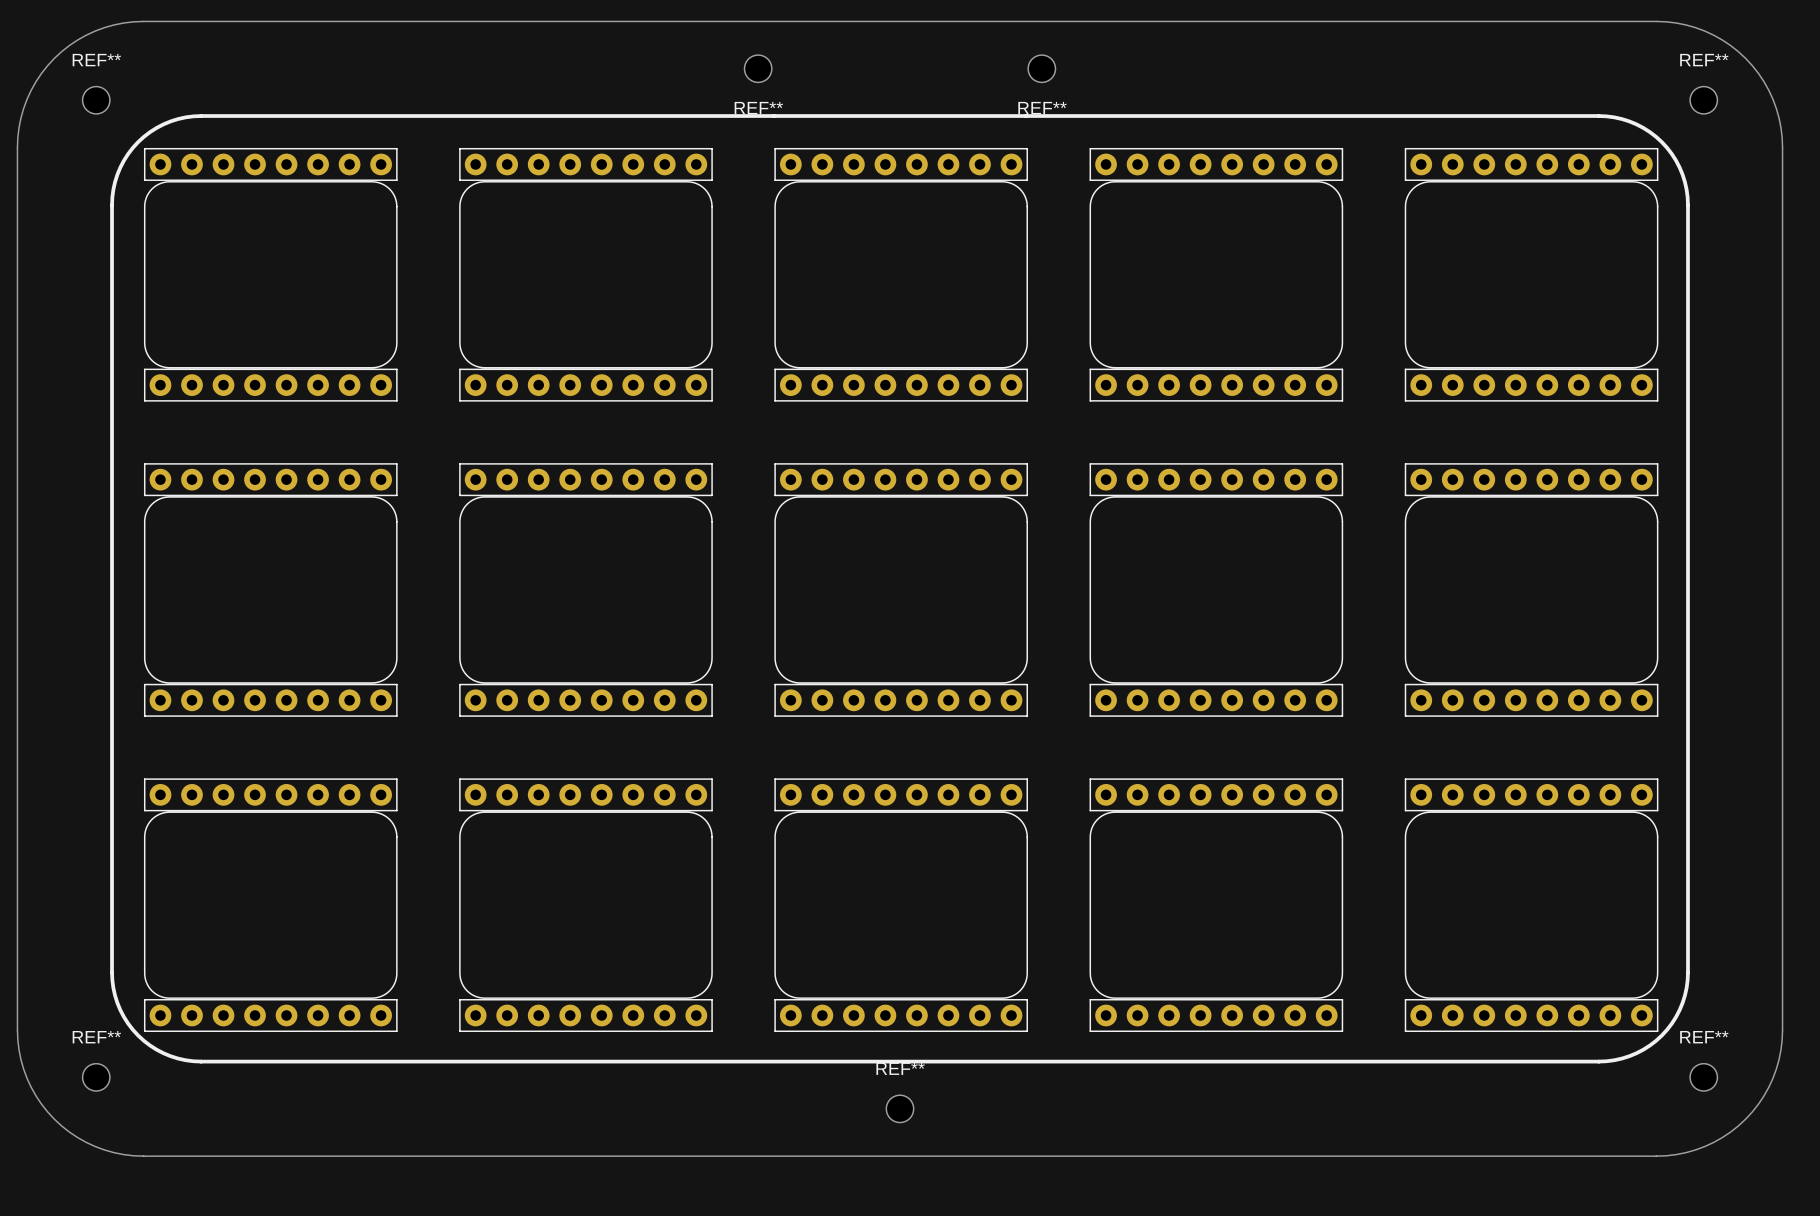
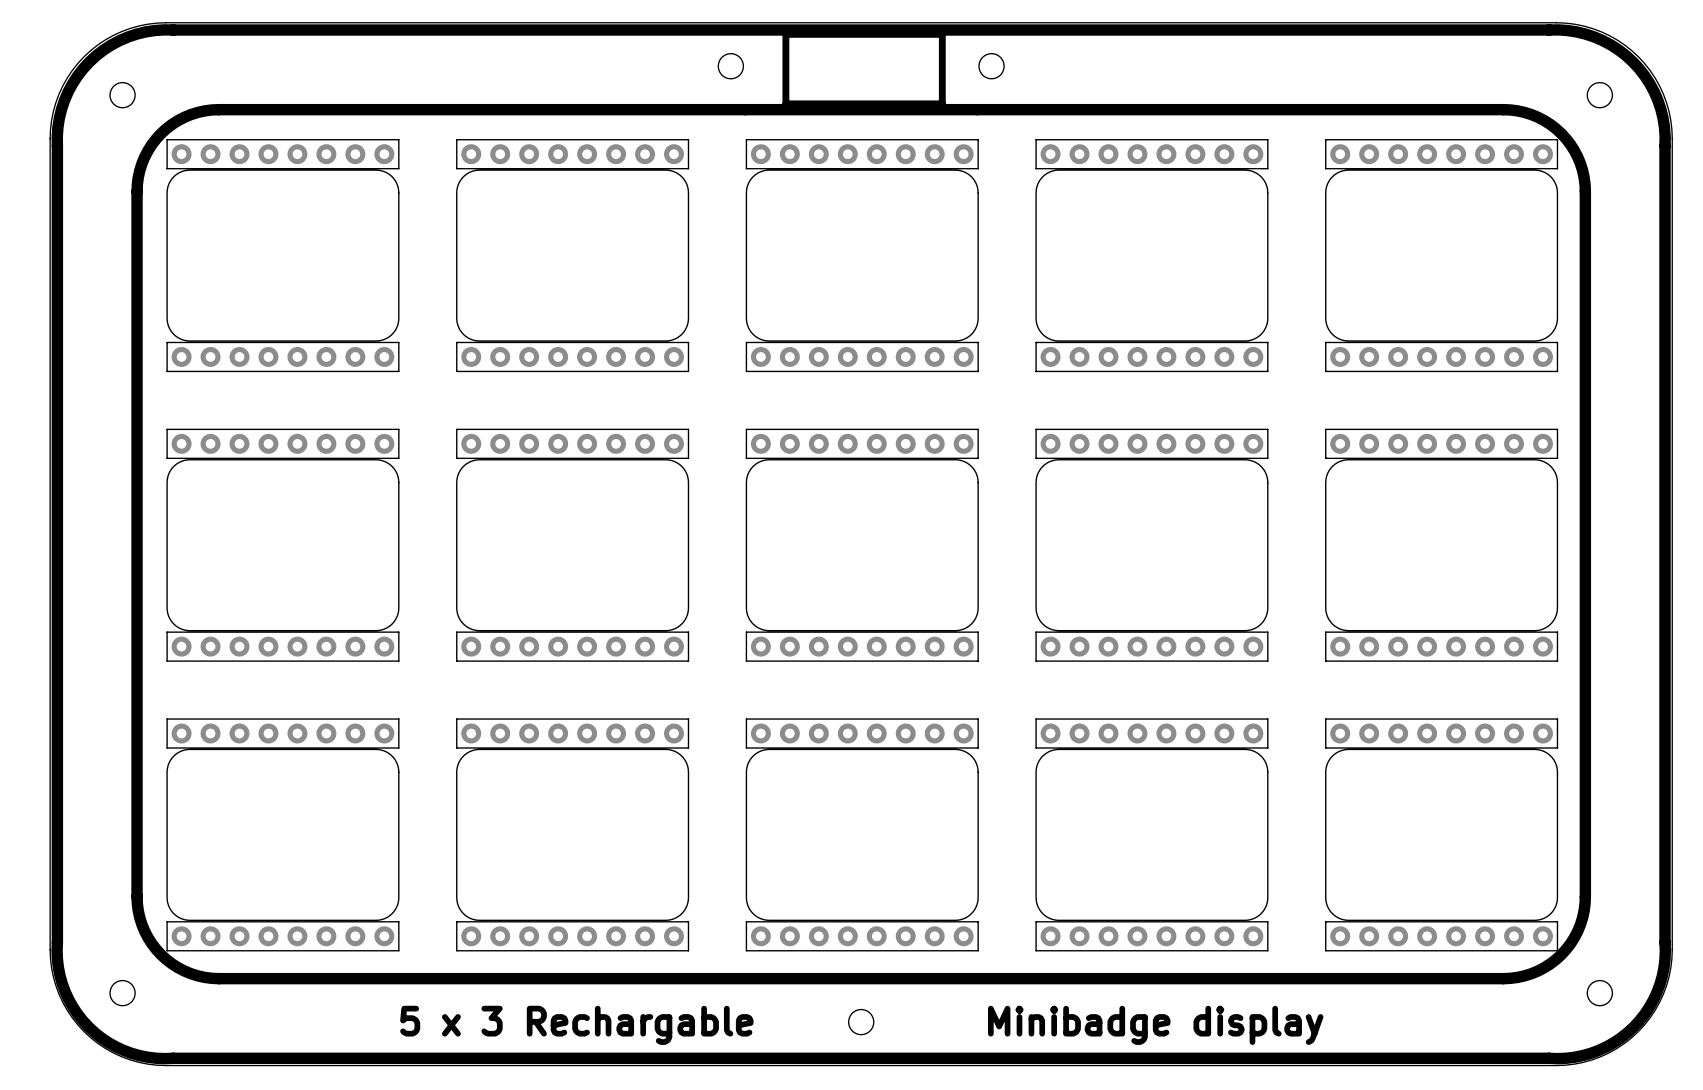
line: none -> (173, 30) (1558, 29) (1585, 34) (1602, 40) (1618, 50) (1633, 62) (1649, 83) (1660, 109) (1665, 136) (1665, 950) (1660, 984) (1649, 1007) (1633, 1027) (1613, 1042) (1590, 1053) (1557, 1058) (164, 1058) (131, 1053) (108, 1042) (88, 1027) (72, 1007) (62, 984) (57, 959) (57, 136) (61, 109) (68, 92) (83, 68) (96, 55) (119, 40) (136, 34) (154, 30) (173, 30)
line: none -> (785, 34) (942, 34) (942, 103) (785, 103) (785, 34)
REF** name: REF** (96, 60) -> none
REF** name: REF** (1704, 60) -> none
REF** name: REF** (758, 108) -> none
REF** name: REF** (1042, 108) -> none
line width: thin (201, 116) (1598, 116) (1621, 119) (1643, 127) (1661, 142) (1676, 160) (1684, 182) (1687, 205) (1687, 972) (1684, 995) (1676, 1017) (1661, 1035) (1643, 1049) (1621, 1058) (1598, 1061) (201, 1061) (178, 1058) (156, 1049) (138, 1035) (128, 1023) (117, 1002) (112, 980) (112, 197) (120, 167) (138, 142) (163, 124) (178, 119) (201, 116) -> thick (218, 109) (1503, 109) (1524, 112) (1544, 120) (1561, 133) (1574, 150) (1582, 170) (1585, 191) (1585, 896) (1582, 917) (1574, 937) (1561, 954) (1544, 967) (1524, 975) (1503, 978) (218, 978) (197, 975) (178, 967) (161, 954) (151, 943) (141, 924) (137, 903) (137, 184) (144, 156) (161, 133) (184, 117) (197, 112) (218, 109)
REF** name: REF** (96, 1037) -> none
REF** name: REF** (1704, 1037) -> none
REF** name: REF** (900, 1068) -> none
text: none -> 5 x 3 Rechargable Minibadge display (861, 1025)

